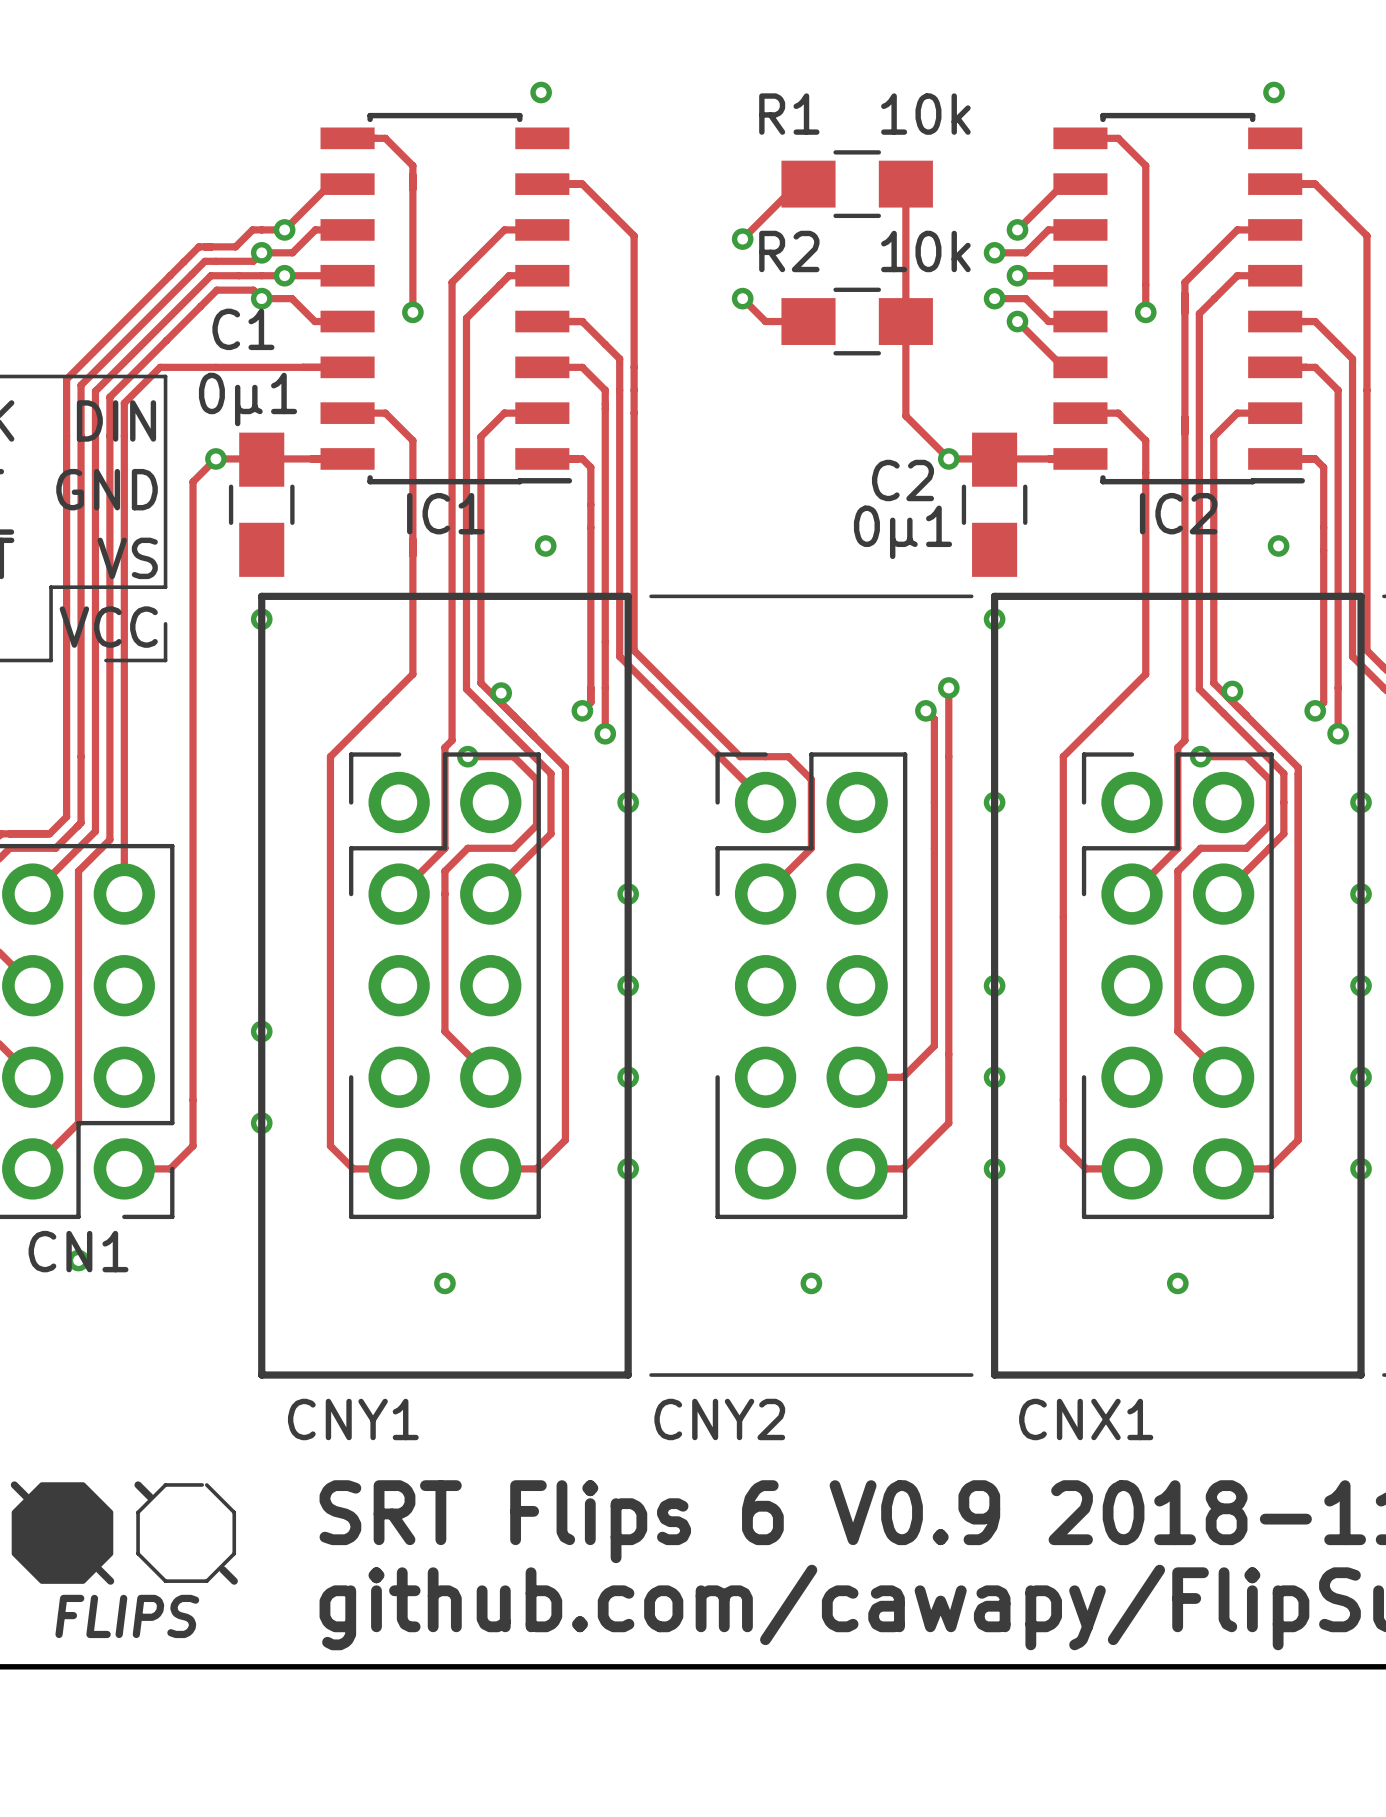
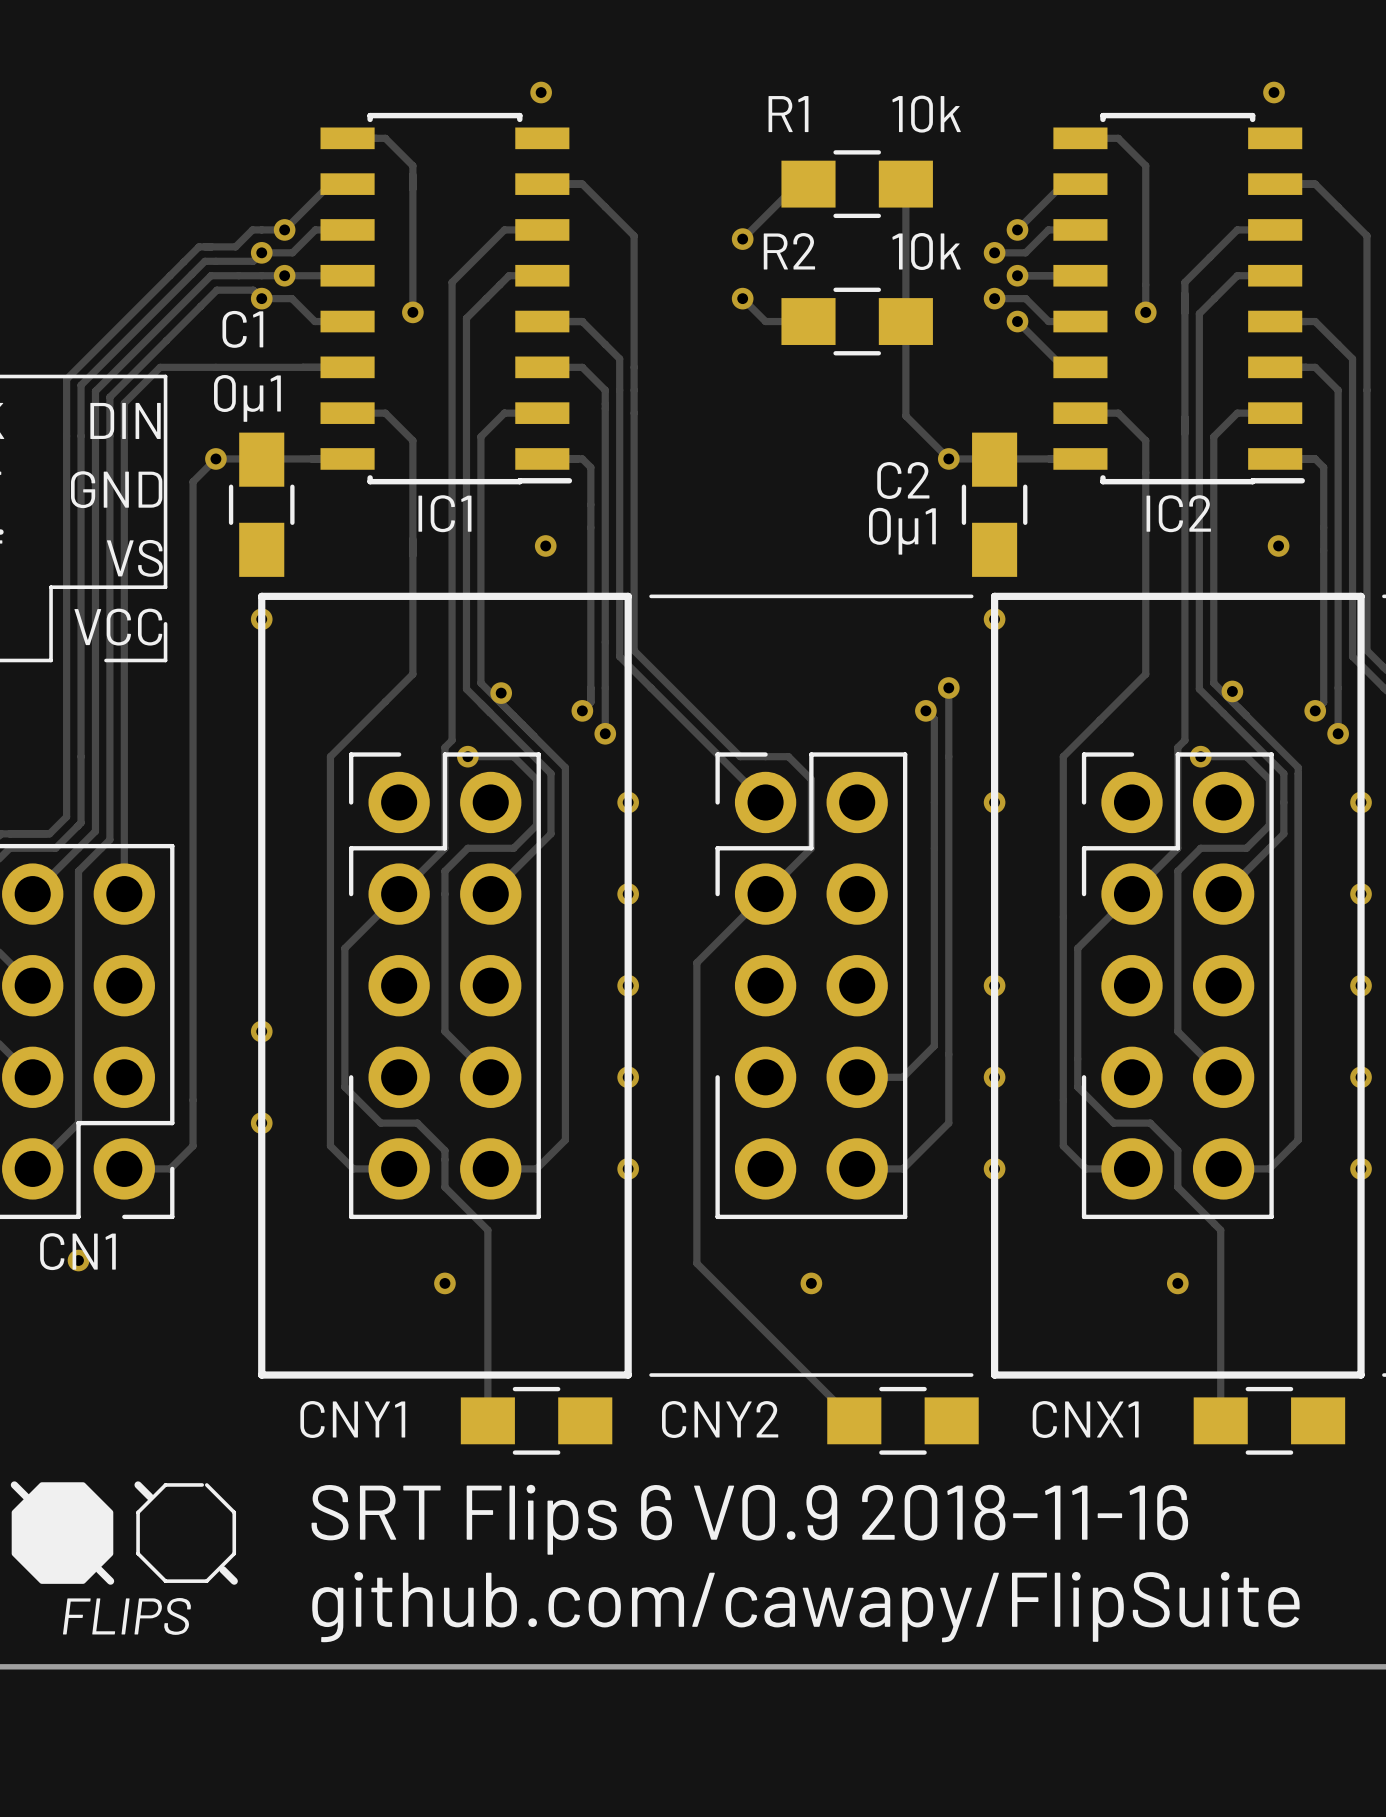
track: none -> (399, 894) (344, 948) (344, 1087) (380, 1123) (417, 1123) (444, 1150) (444, 1187) (487, 1230) (487, 1420)
track: none -> (765, 894) (696, 962) (696, 1263) (854, 1420)
track: none -> (1132, 894) (1077, 948) (1077, 1087) (1113, 1123) (1150, 1123) (1177, 1150) (1177, 1187) (1220, 1230) (1220, 1420)
part: none -> (536, 1420)
part: none -> (902, 1420)
part: none -> (1269, 1420)

